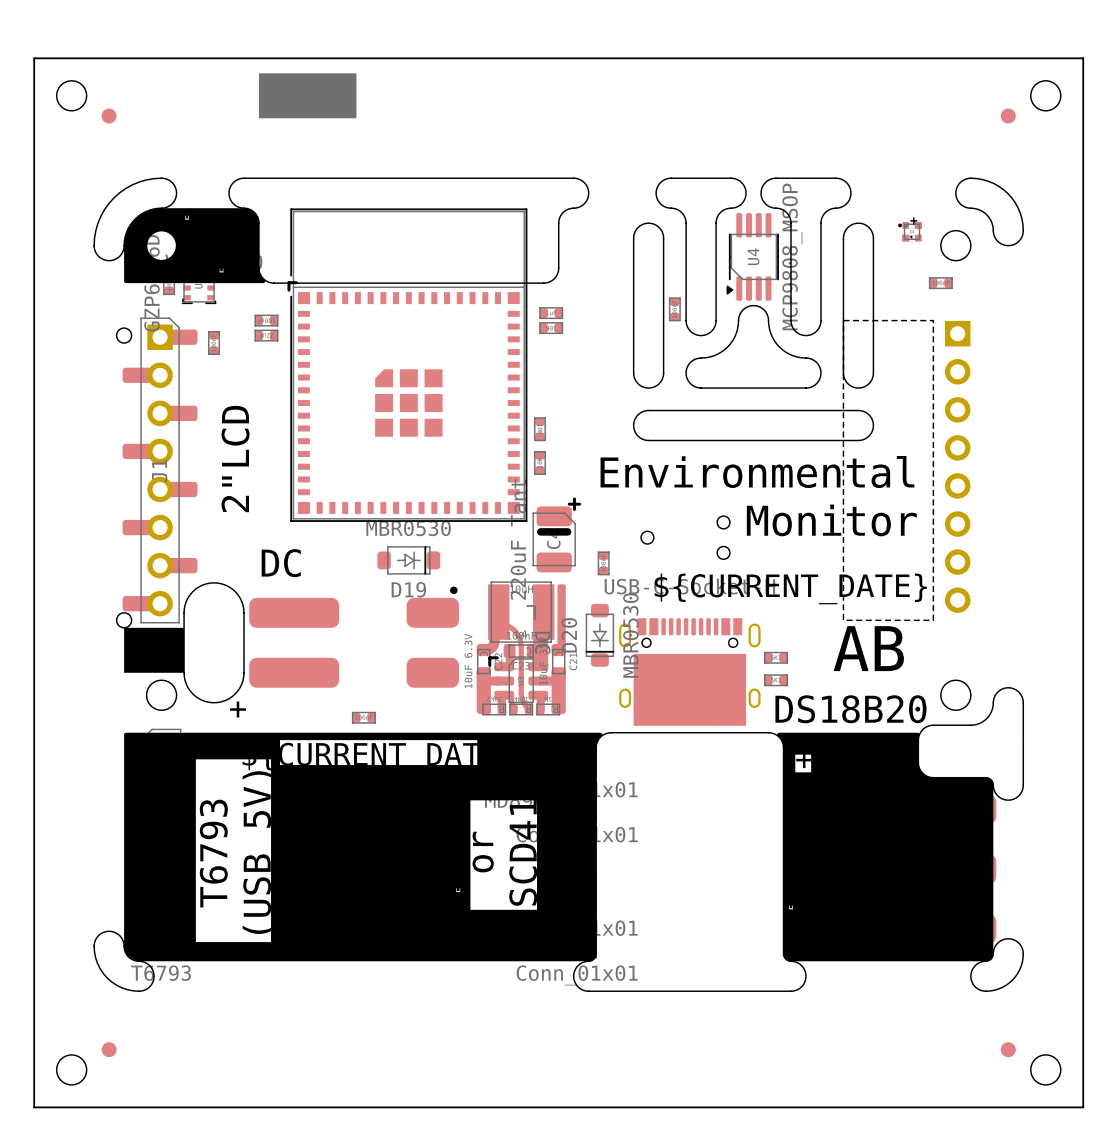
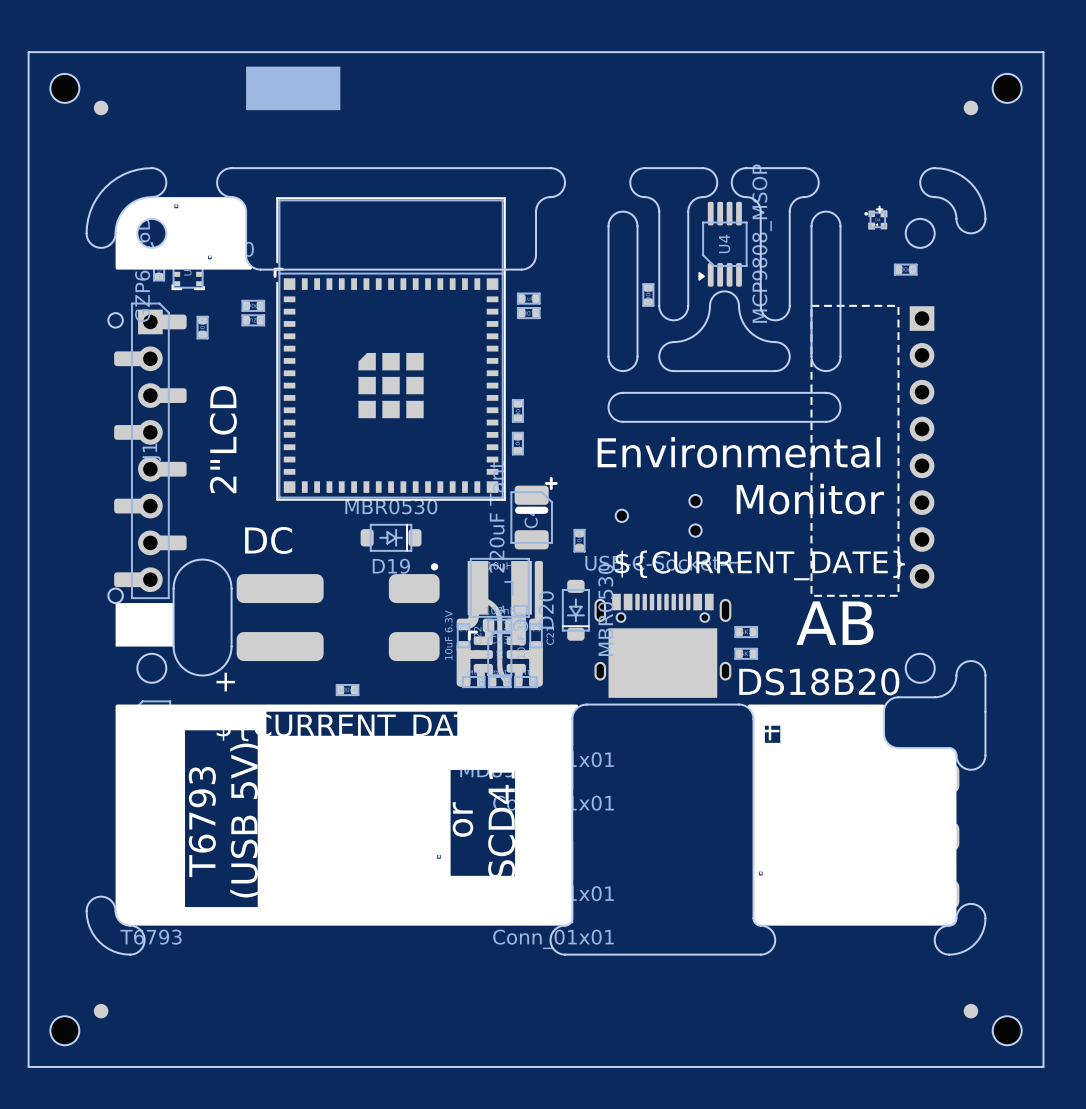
U4 footprint: [726, 213, 779, 301] -> [698, 201, 748, 287]

